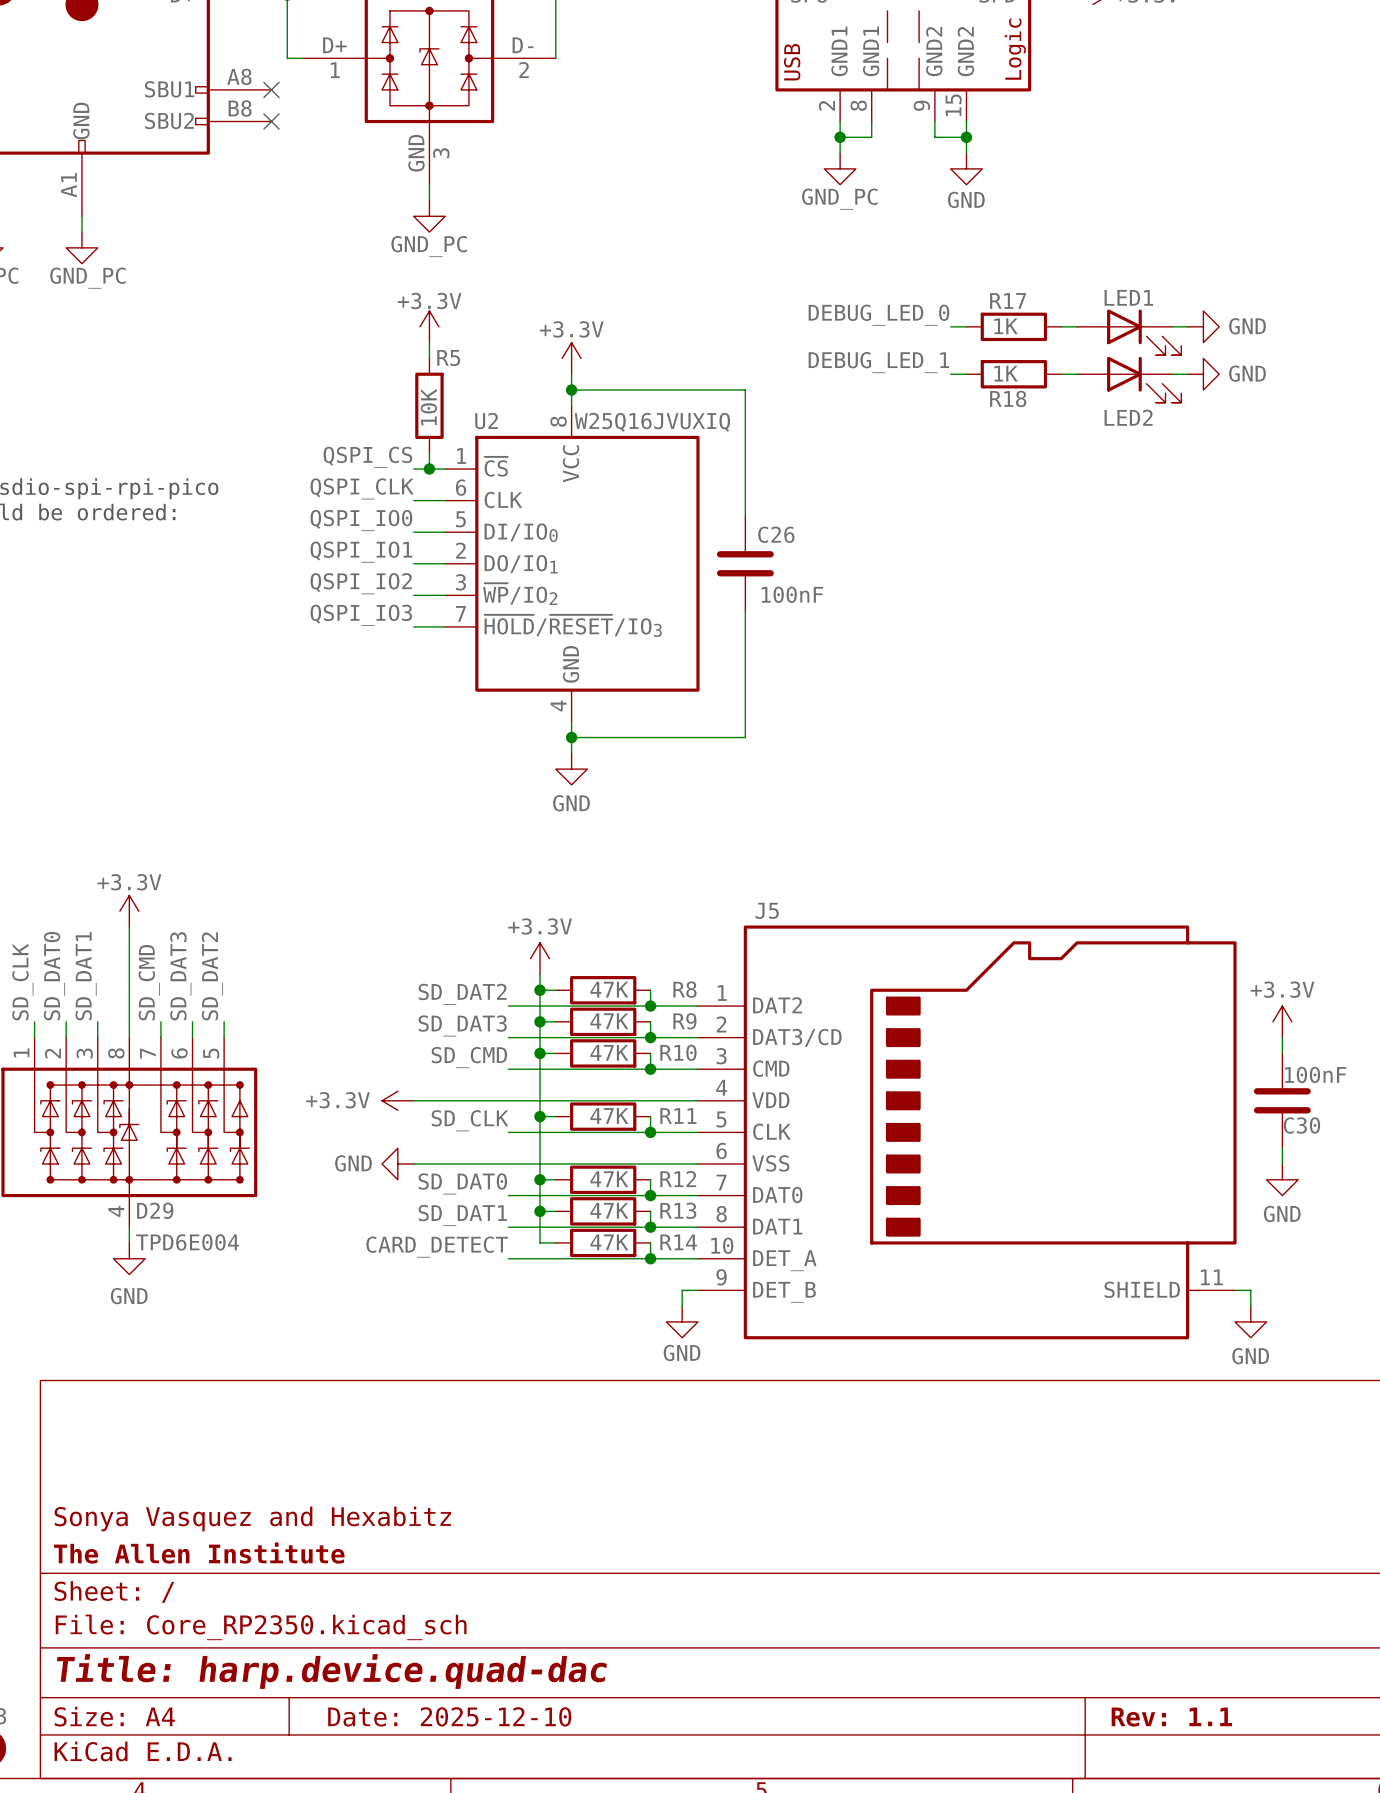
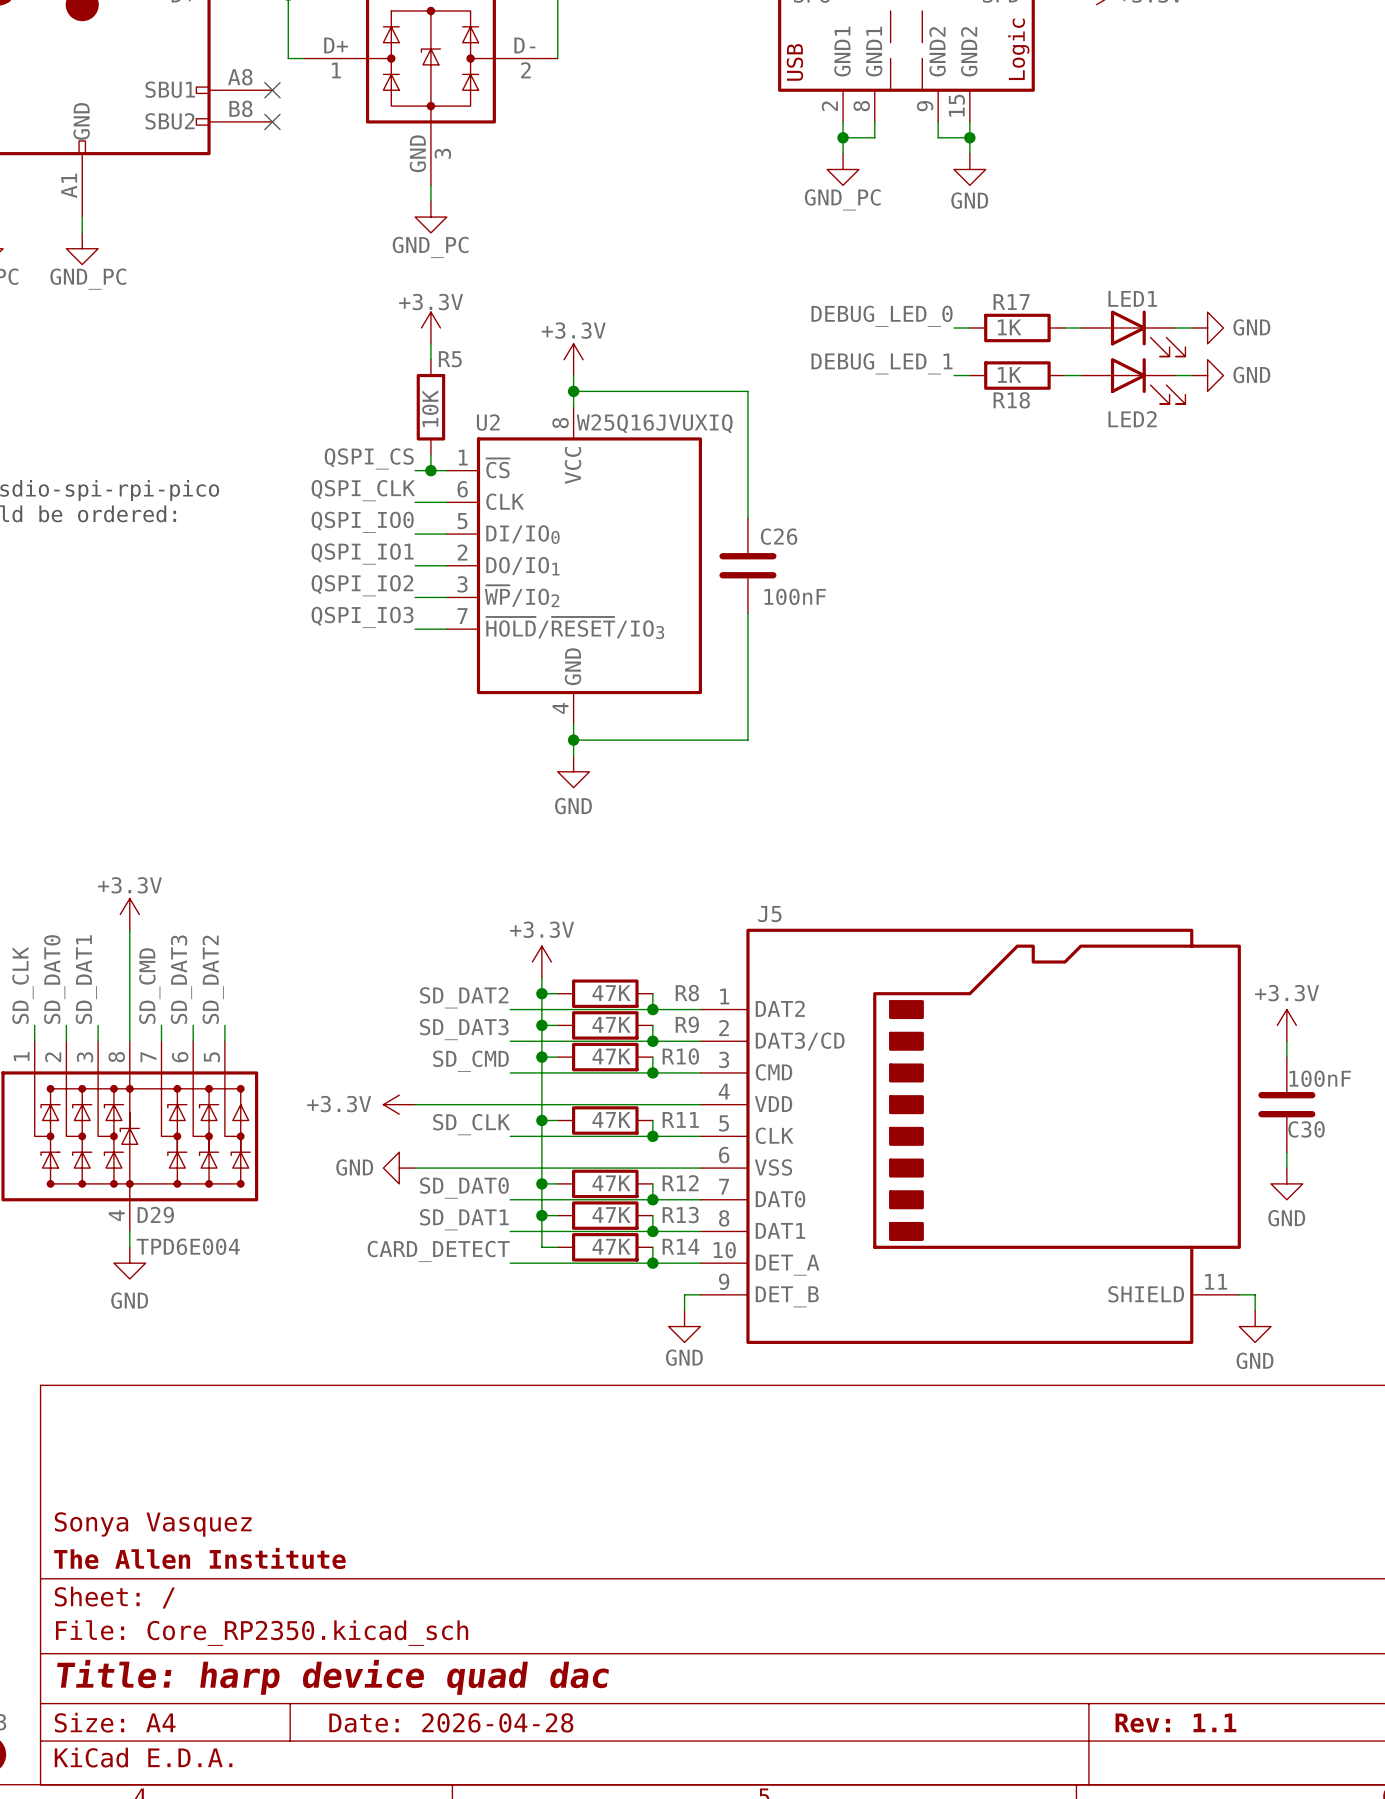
title block: Sonya Vasquez and Hexabitz (252, 1518) -> Sonya Vasquez (153, 1524)
title block: Title: harp.device.quad-dac (331, 1671) -> Title: harp device quad dac (333, 1677)
title block: Date: 2025-12-10 (449, 1716) -> Date: 2026-04-28 (451, 1722)

